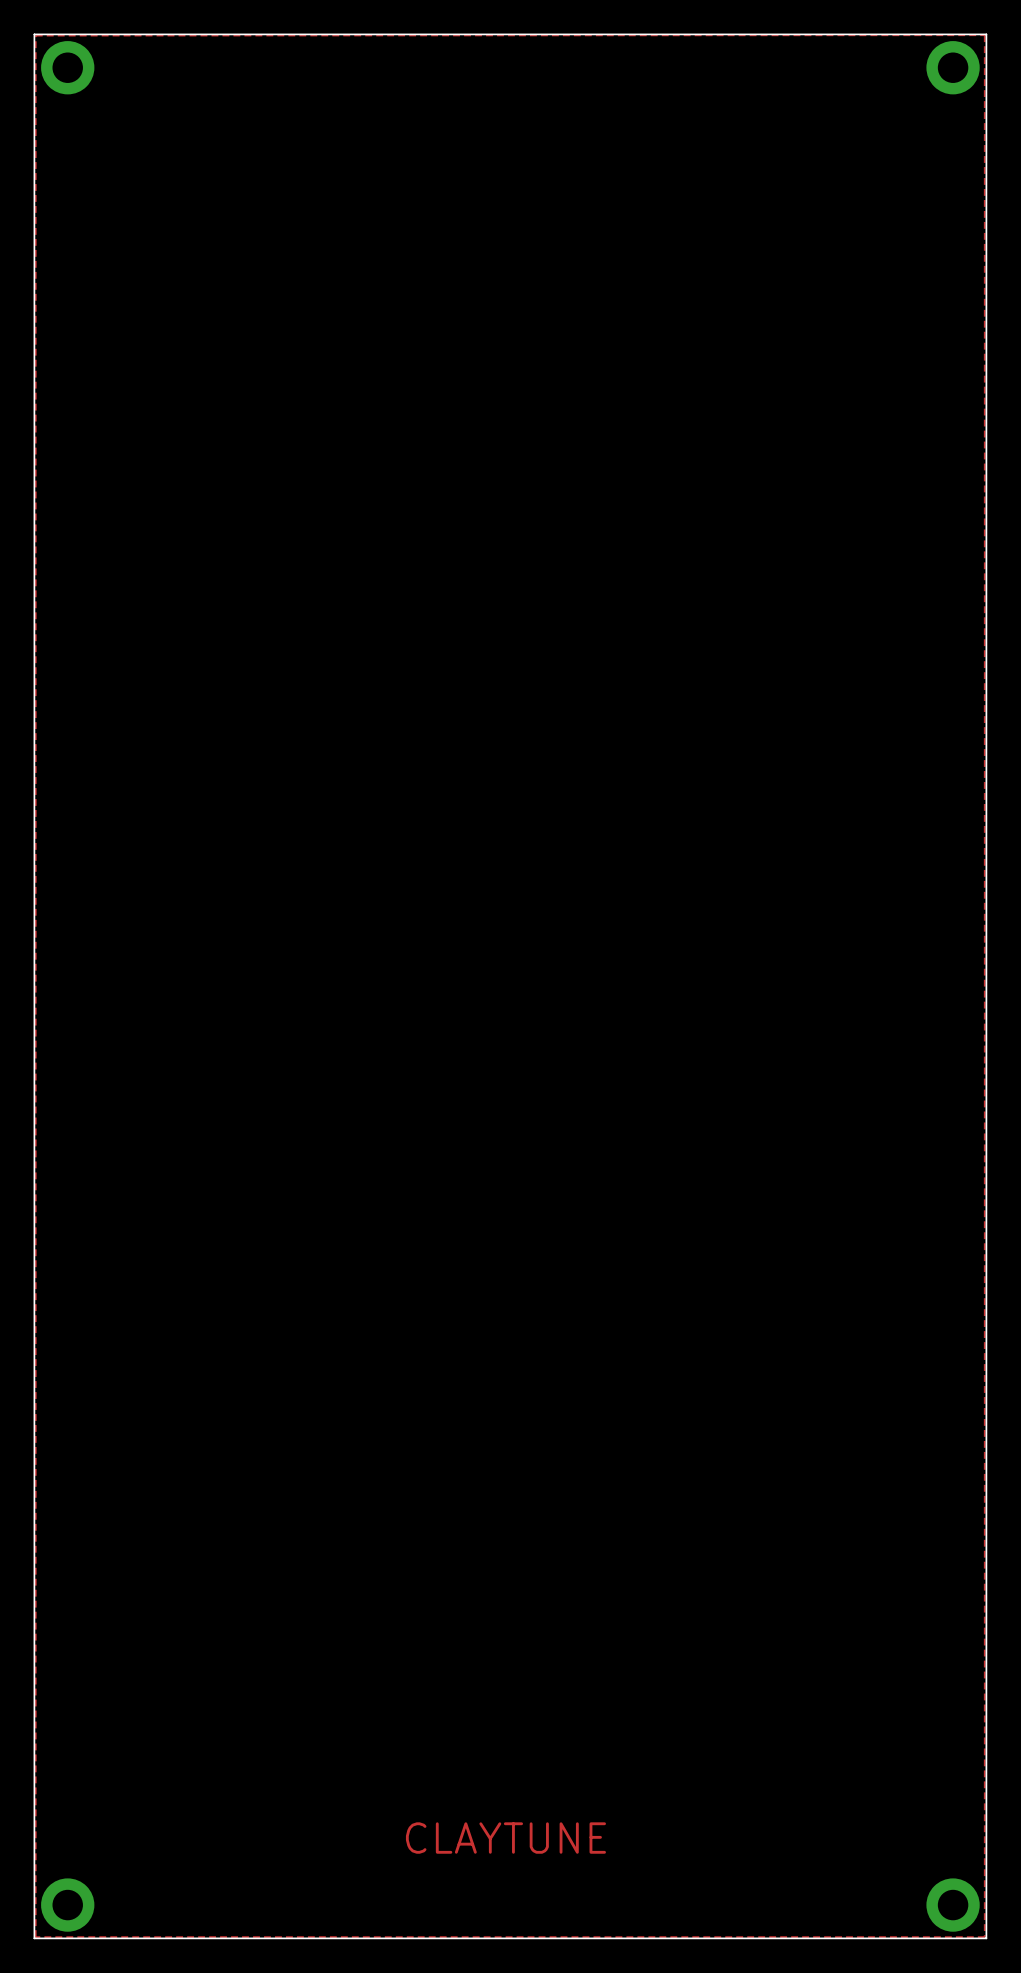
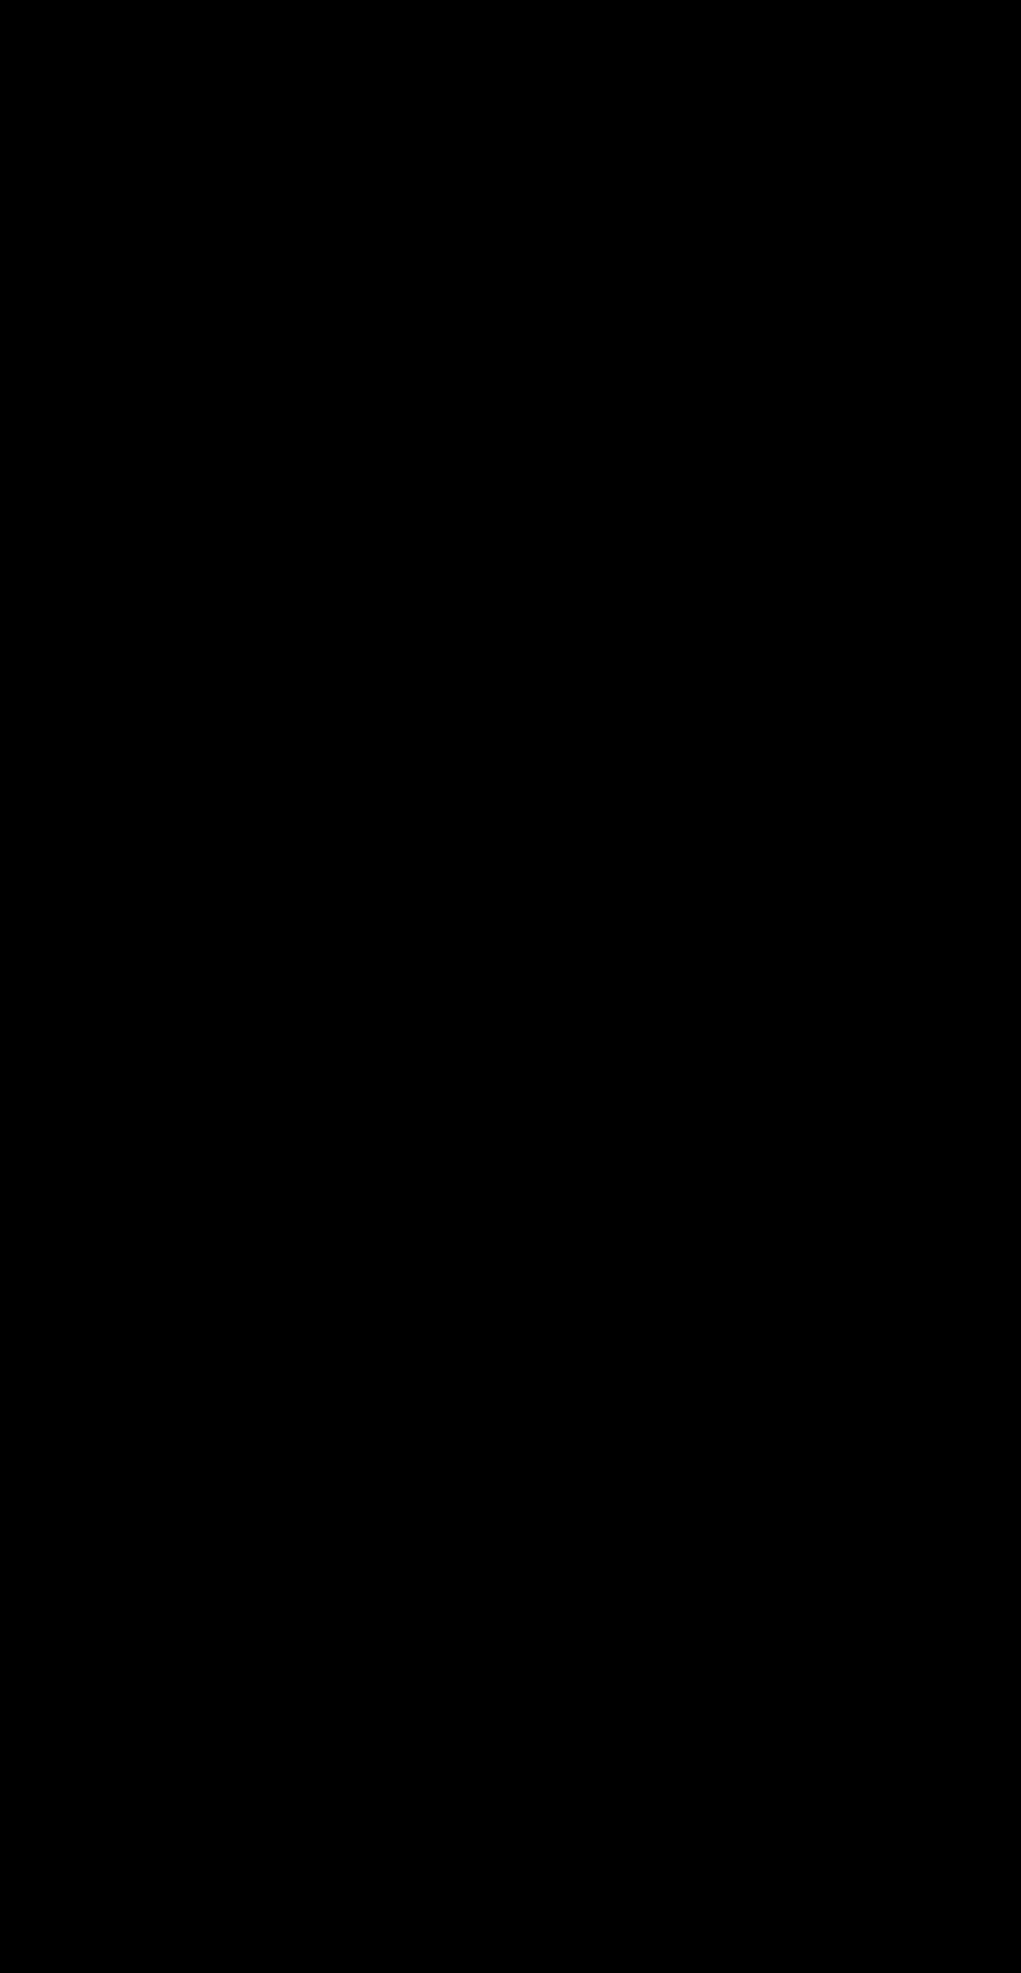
board edge: (34, 34) (986, 34) (986, 1938) (34, 1938) (34, 34) -> none
zone outline: (984, 35) (35, 35) (35, 1937) (984, 1937) (984, 35) -> none
part: (67, 67) -> none
part: (953, 67) -> none
text: CLAYTUNE (505, 1838) -> none
part: (67, 1905) -> none
part: (953, 1905) -> none

